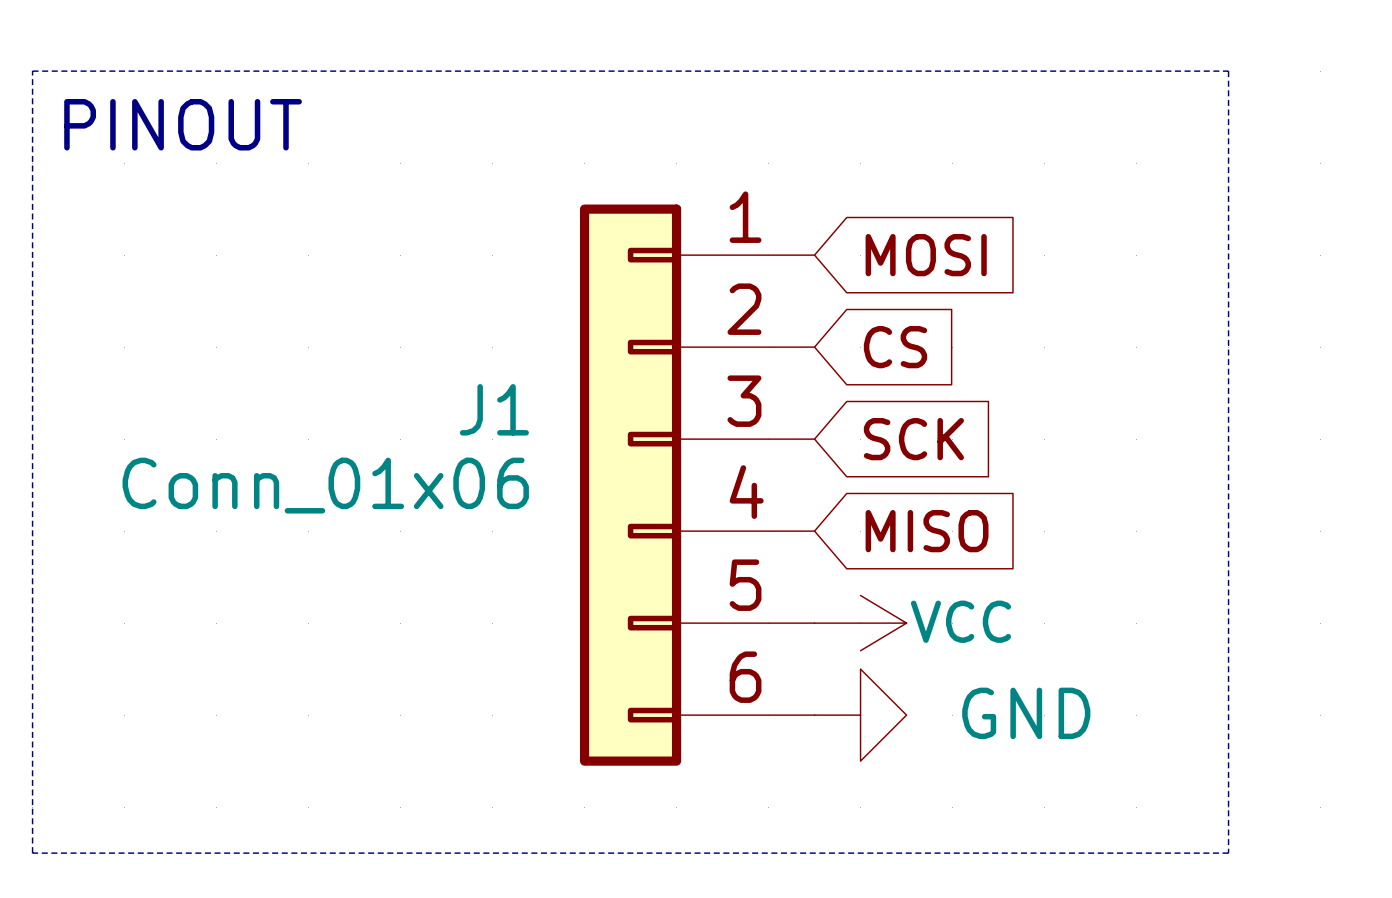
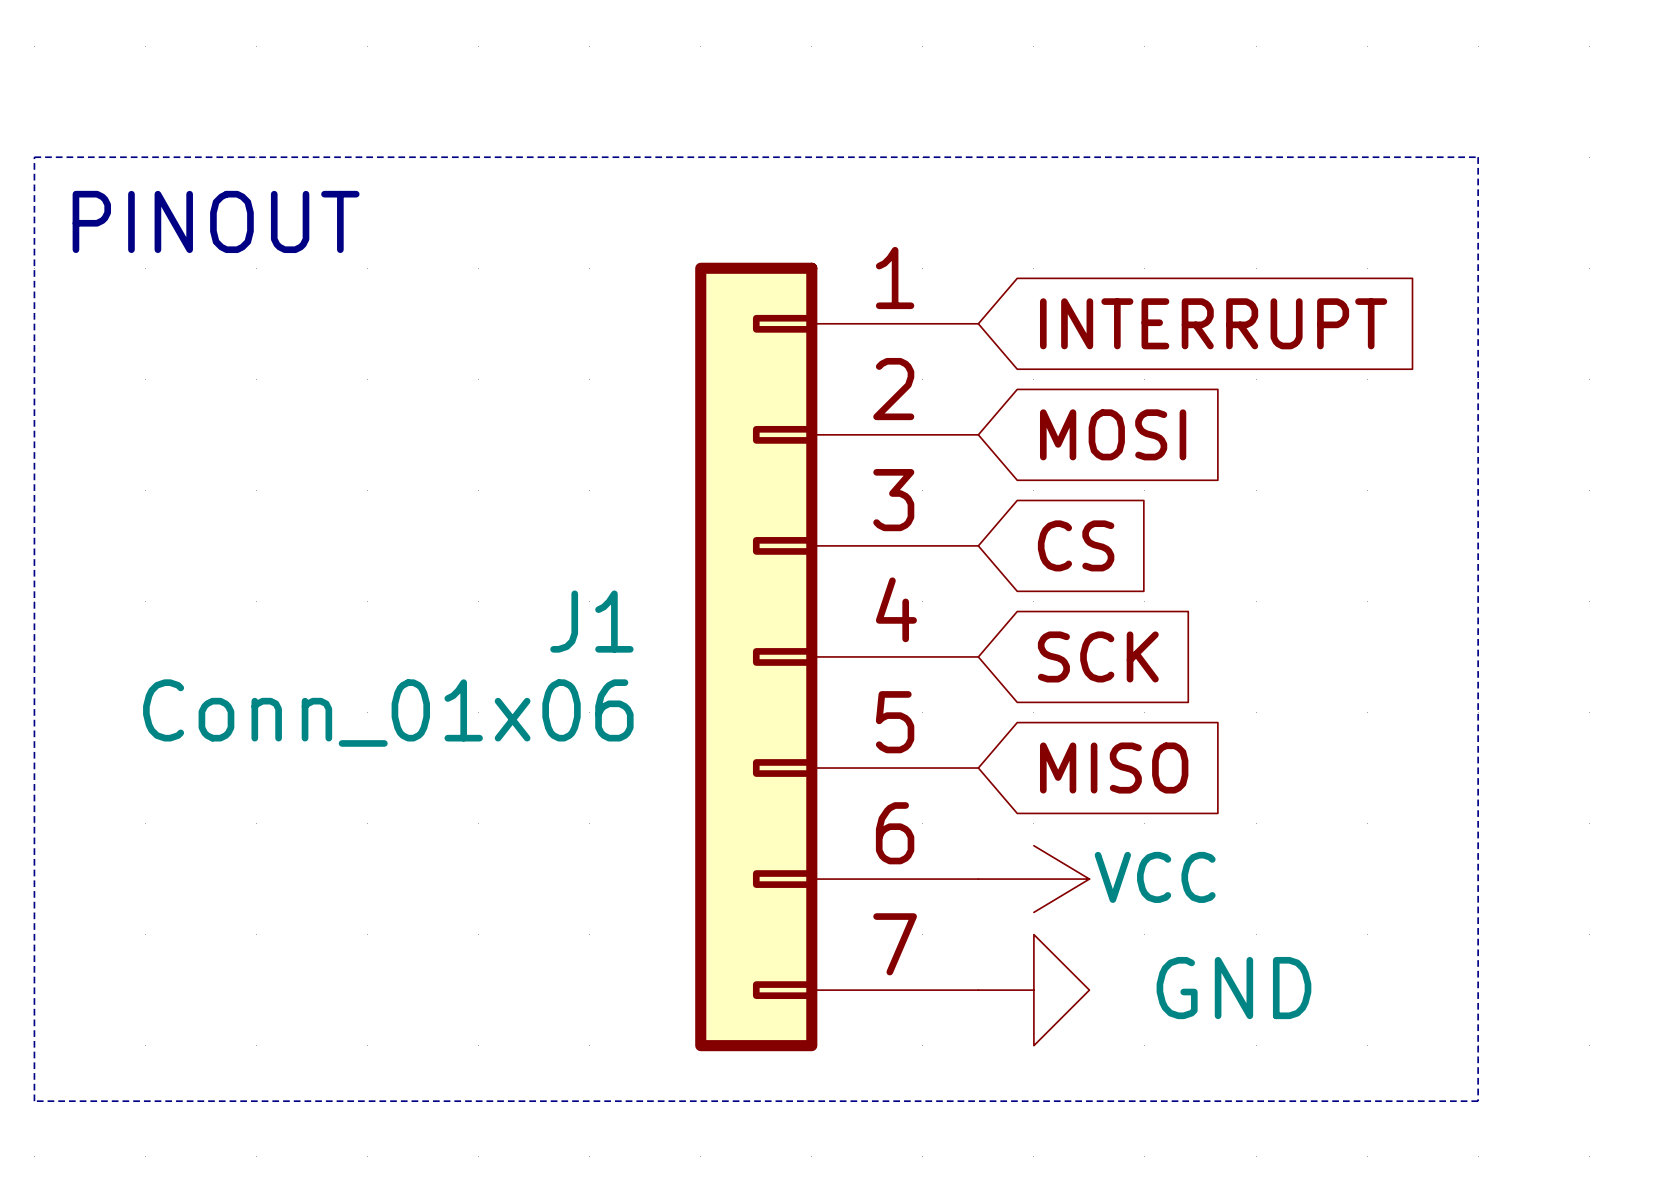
J1 symbol: [579, 204, 815, 766] -> [695, 262, 979, 1052]
global label: none -> INTERRUPT (1213, 323)
global label position: MOSI (926, 255) -> MOSI (1113, 434)
global label position: CS (895, 347) -> CS (1076, 545)
global label position: SCK (913, 439) -> SCK (1098, 656)
global label position: MISO (927, 531) -> MISO (1114, 768)
power symbol position: VCC (860, 623) -> VCC (1033, 879)
power symbol position: GND (860, 715) -> GND (1033, 990)

